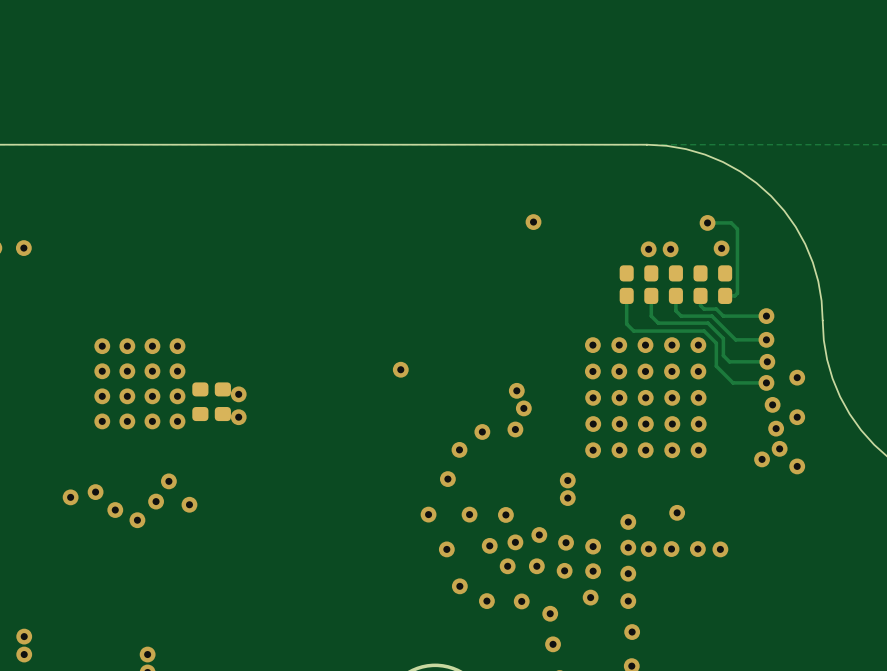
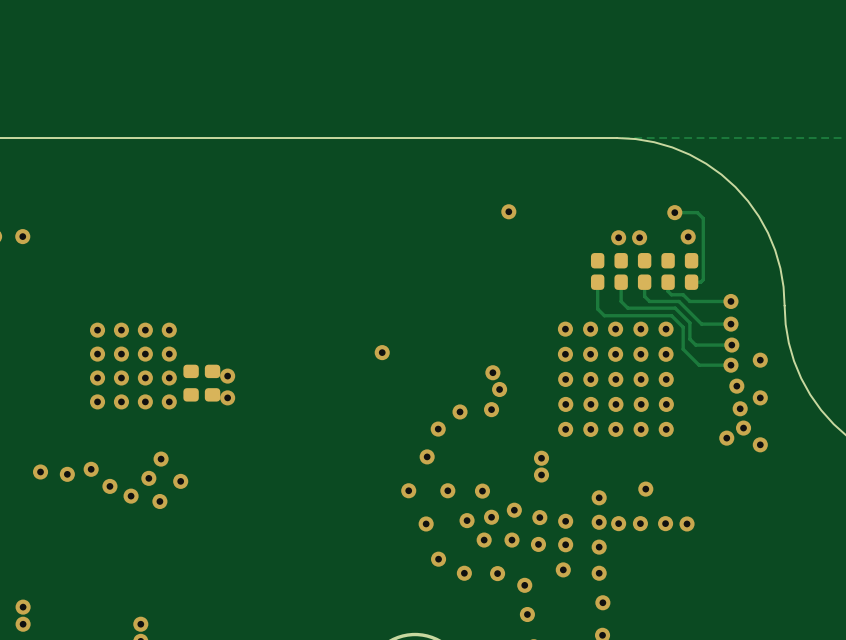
via: none -> (40, 471)
via: none -> (159, 501)

